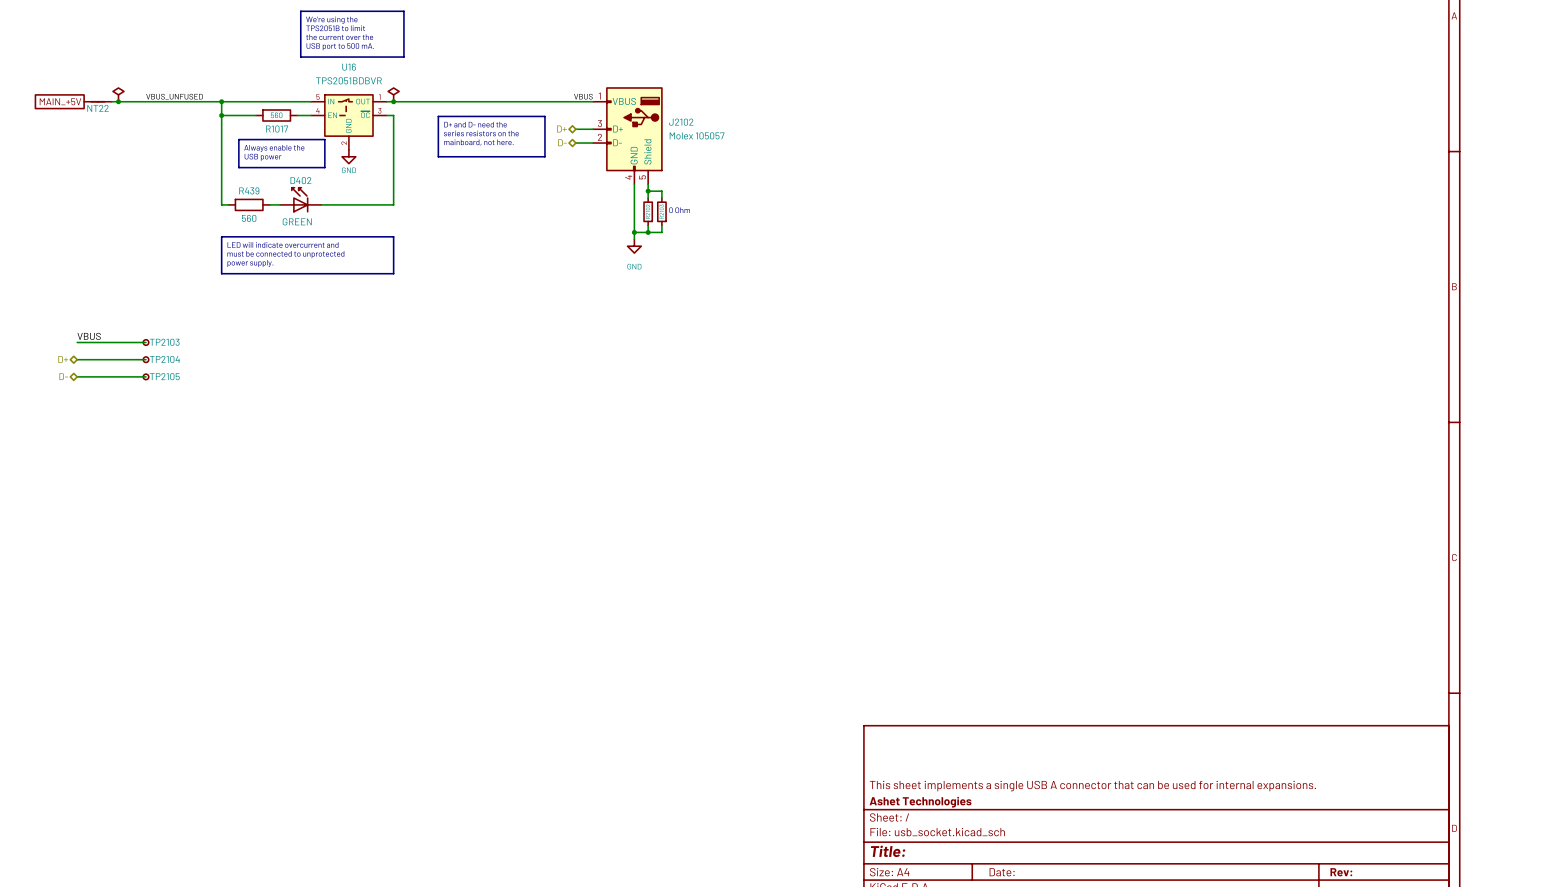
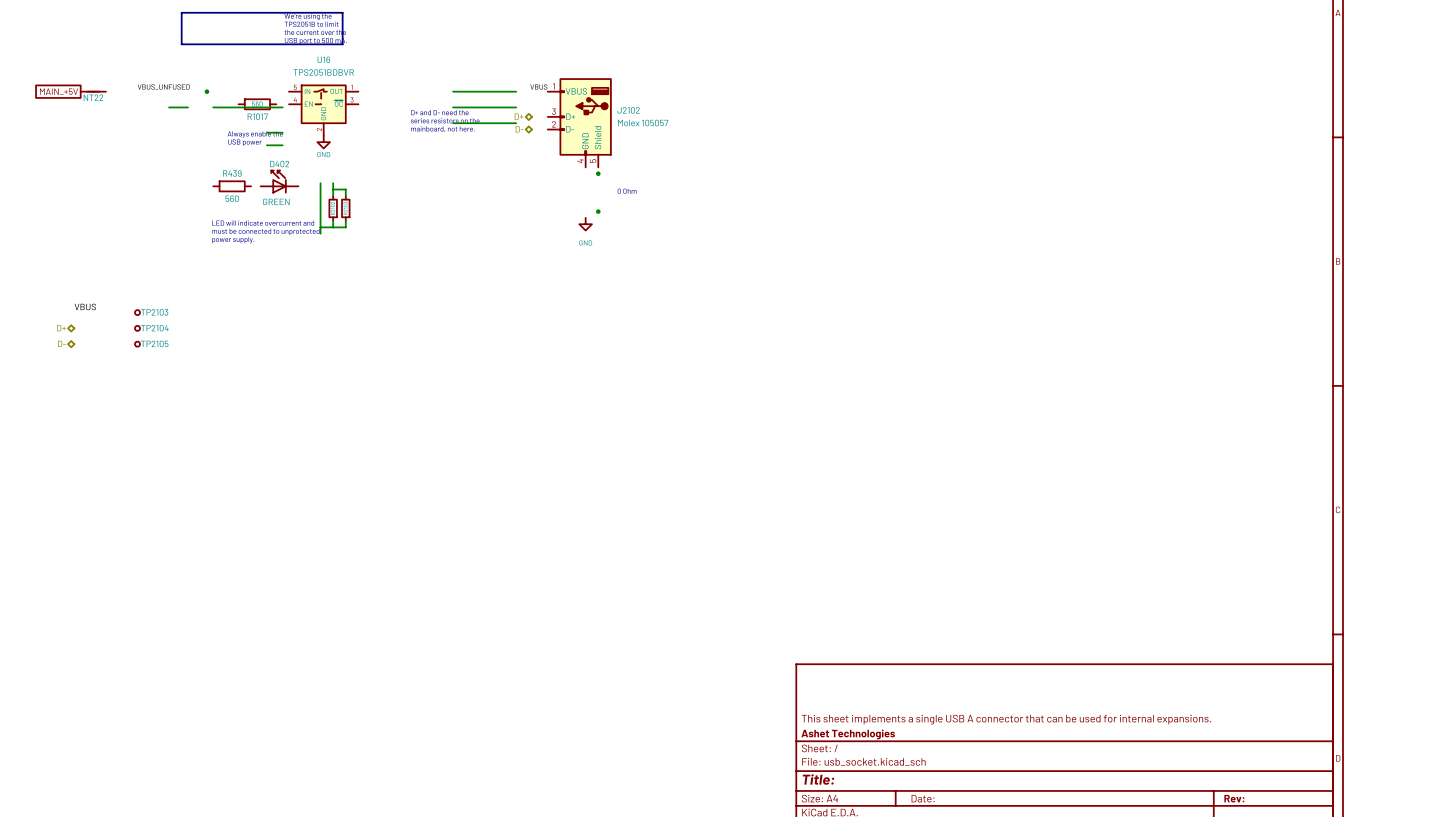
line: (300, 11) (403, 11) (403, 57) (300, 57) (300, 11) -> none
line: none -> (181, 12) (342, 12) (342, 44) (181, 44) (181, 12)
power symbol: (118, 94) -> none
power symbol: (393, 94) -> none
wire: (111, 101) (311, 101) -> none
junction: (118, 101) -> none
wire: (221, 101) (221, 204) (228, 204) -> none
wire: (386, 101) (489, 101) -> none
junction: (393, 101) -> none
wire: (558, 101) (593, 101) -> none
wire: (221, 115) (256, 115) -> none
junction: (221, 115) -> none
wire: (297, 115) (311, 115) -> none
wire: (386, 115) (393, 115) (393, 204) (321, 204) -> none
line: (438, 116) (544, 116) (544, 156) (438, 156) (438, 116) -> none
wire: none -> (169, 107) (187, 107)
wire: none -> (213, 107) (282, 107)
wire: none -> (453, 107) (516, 107)
wire: (575, 129) (593, 129) -> none
wire: none -> (453, 123) (516, 123)
line: (238, 139) (324, 139) (324, 167) (238, 167) (238, 139) -> none
wire: (575, 143) (593, 143) -> none
wire: none -> (266, 132) (282, 132)
wire: none -> (266, 145) (282, 145)
wire: (634, 184) (634, 239) -> none
wire: (648, 184) (648, 198) -> none
wire: (648, 191) (661, 191) (661, 198) -> none
wire: none -> (320, 183) (320, 233)
wire: none -> (333, 183) (333, 195)
wire: (269, 204) (280, 204) -> none
wire: none -> (333, 189) (345, 189) (345, 195)
part position: (648, 211) -> (333, 208)
part position: (661, 211) -> (345, 208)
wire: (648, 225) (648, 232) -> none
wire: (661, 225) (661, 232) (634, 232) -> none
junction: (634, 232) -> none
line: (221, 236) (393, 236) (393, 273) (221, 273) (221, 236) -> none
wire: none -> (333, 221) (333, 227)
wire: none -> (345, 221) (345, 227) (320, 227)
wire: (77, 342) (146, 342) -> none
wire: (77, 359) (146, 359) -> none
wire: (77, 376) (146, 376) -> none

